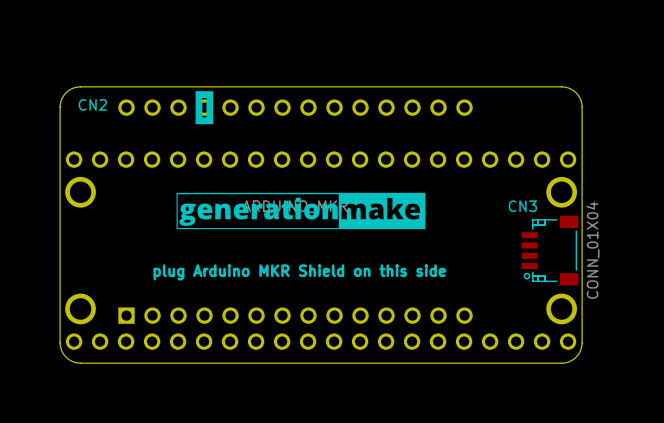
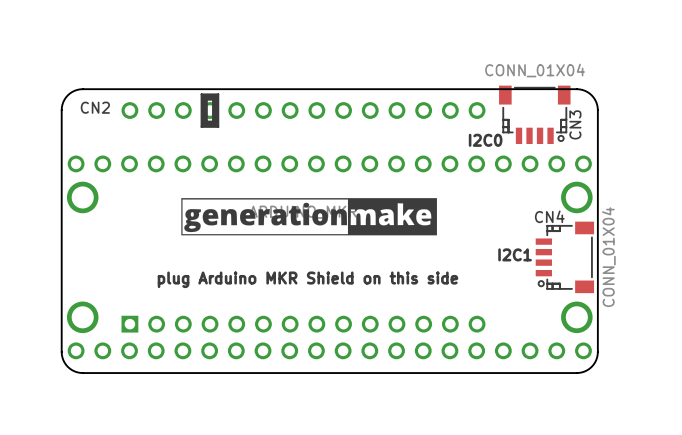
CN3: none -> CONN_01X04 (534, 114)
text: none -> I2C0 (485, 140)
CN3 name: CN3 (522, 206) -> CN4 (549, 216)
text: none -> I2C1 (515, 254)

